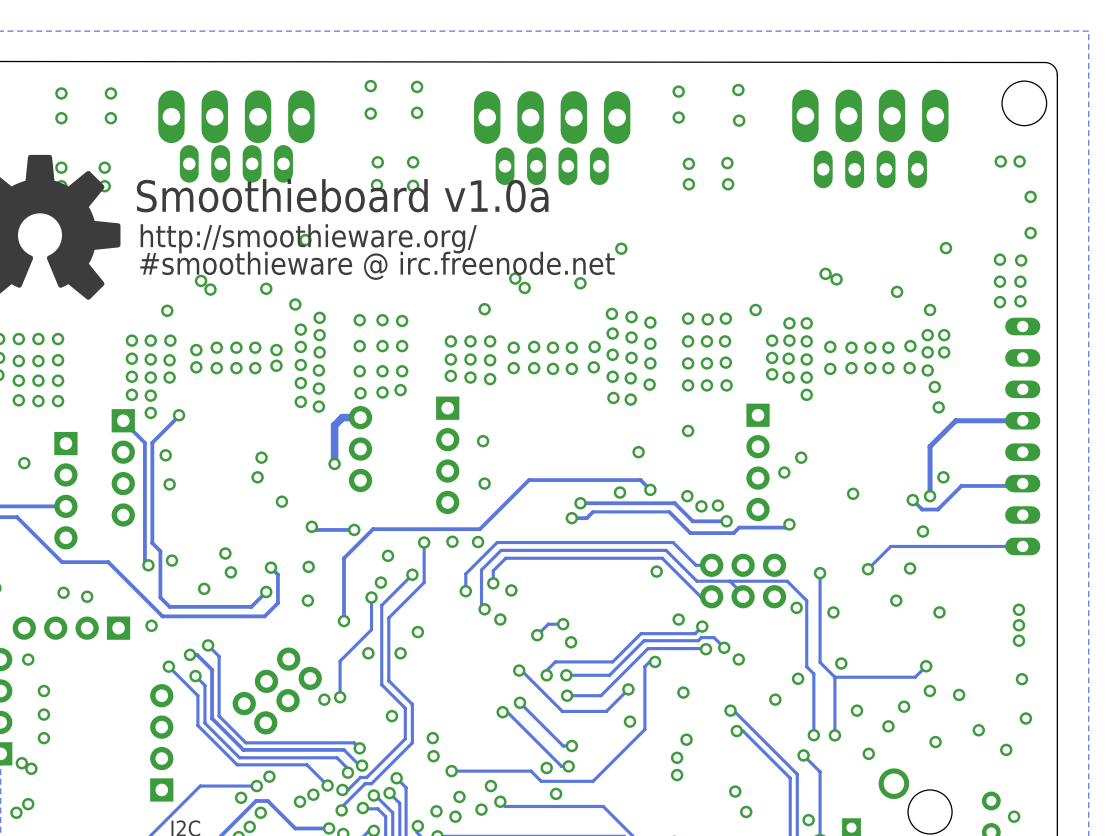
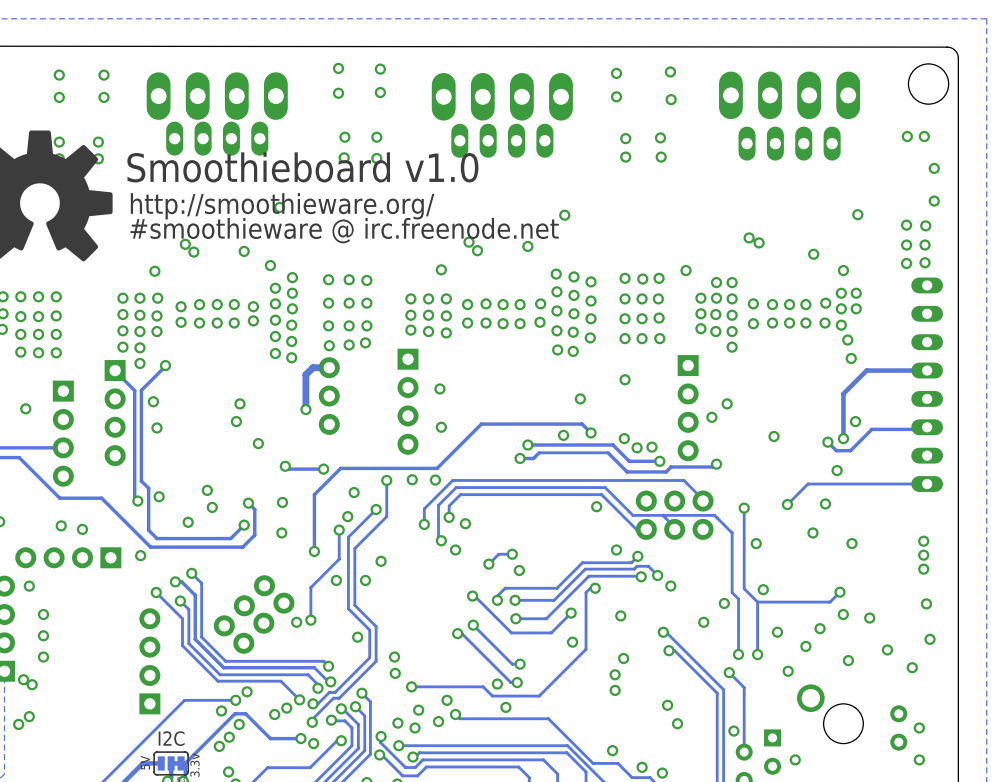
text: Smoothieboard v1.0a (342, 195) -> Smoothieboard v1.0 (302, 167)
track: (673, 542) (695, 565) (711, 565) -> (611, 480) (683, 480) (703, 501)
via: (796, 607) -> none

